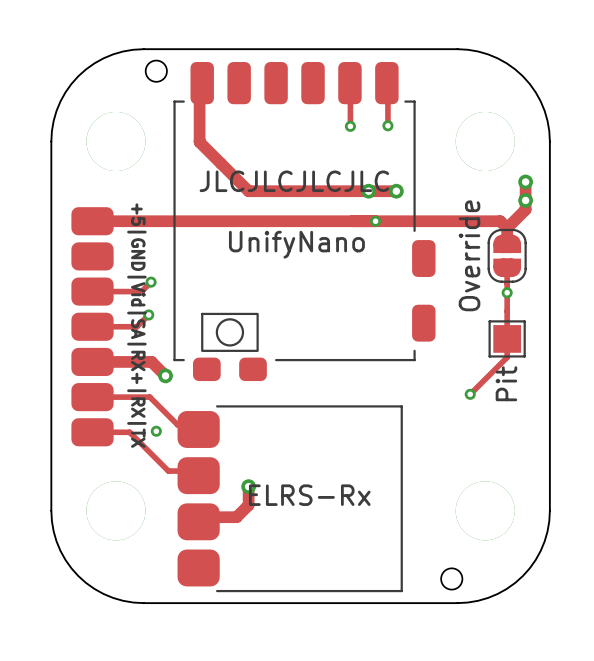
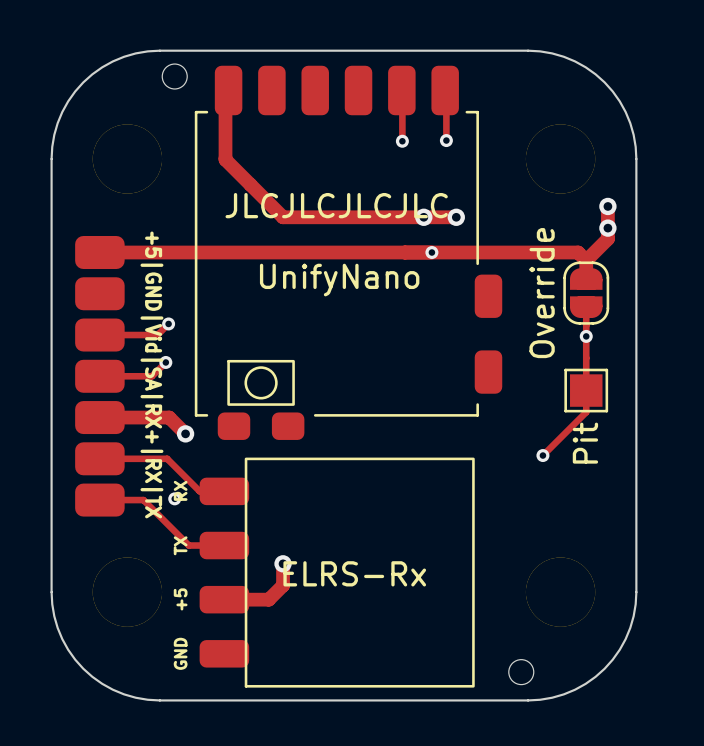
part footprint: [177, 405, 403, 593] -> [199, 457, 475, 688]

